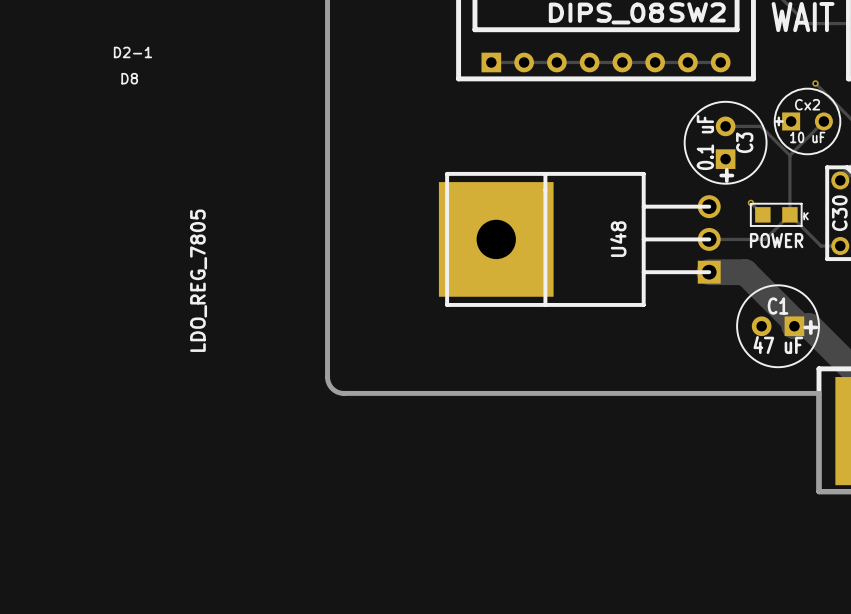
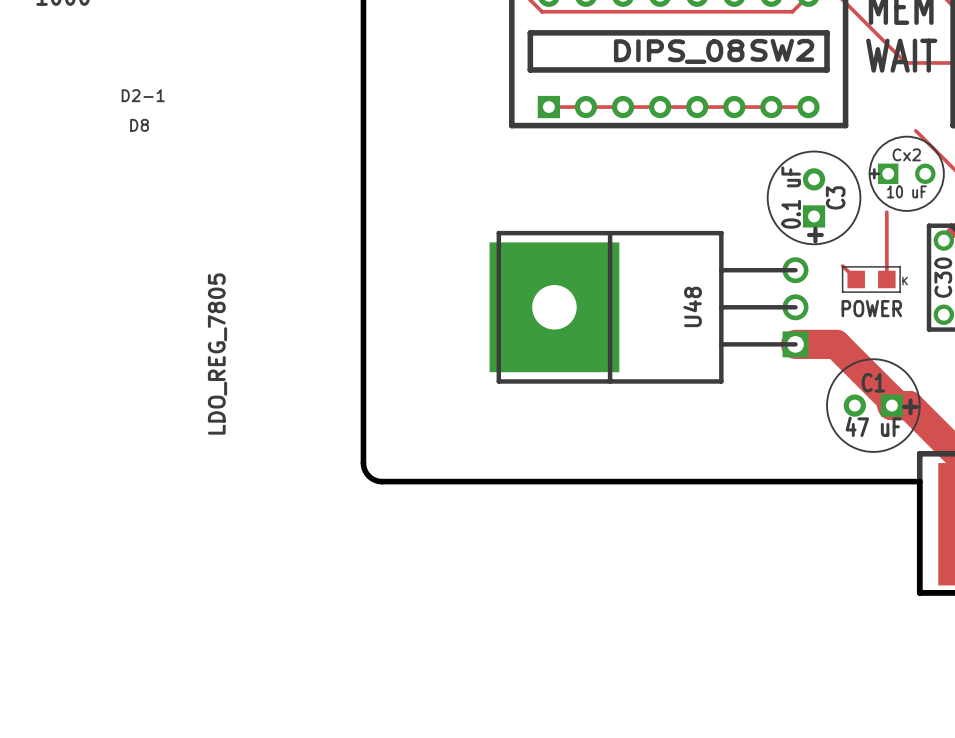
via: (815, 83) -> none
track: (823, 121) (789, 155) (760, 126) (725, 126) -> none
via: (750, 202) -> none
track: (709, 239) (765, 239) (789, 214) (821, 245) (840, 245) -> none

